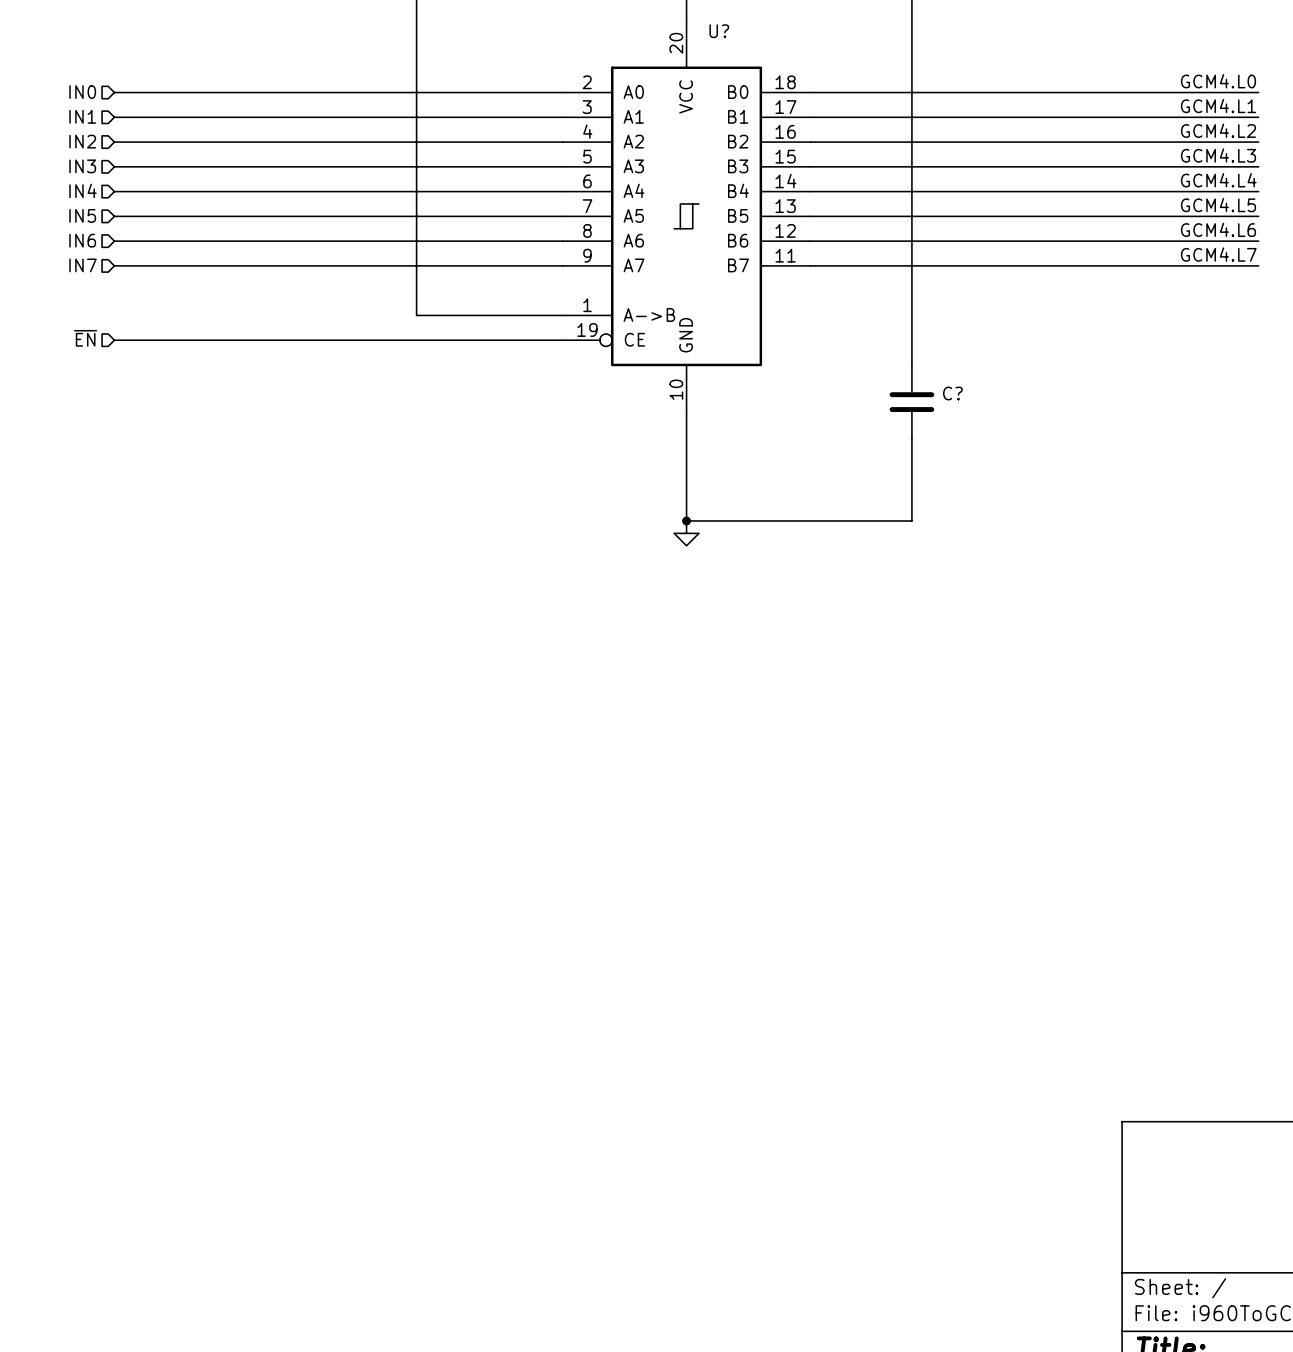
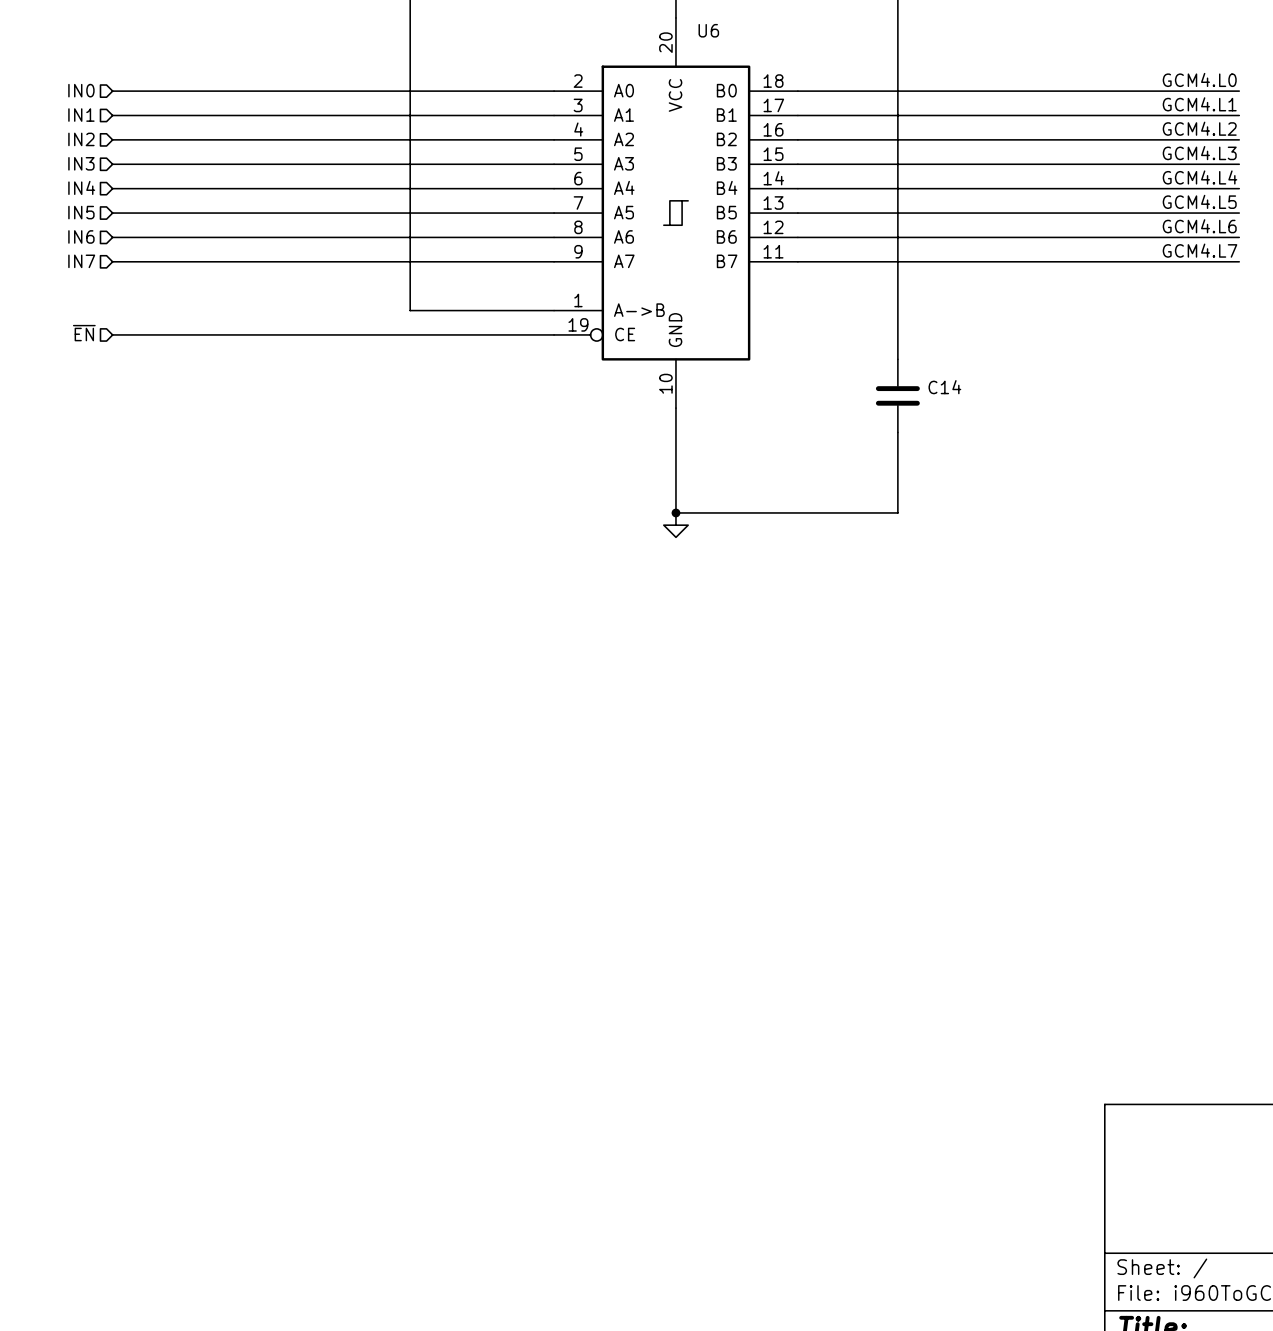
U? name: U? (719, 31) -> U6 (708, 30)
C? name: C? (952, 393) -> C14 (944, 387)

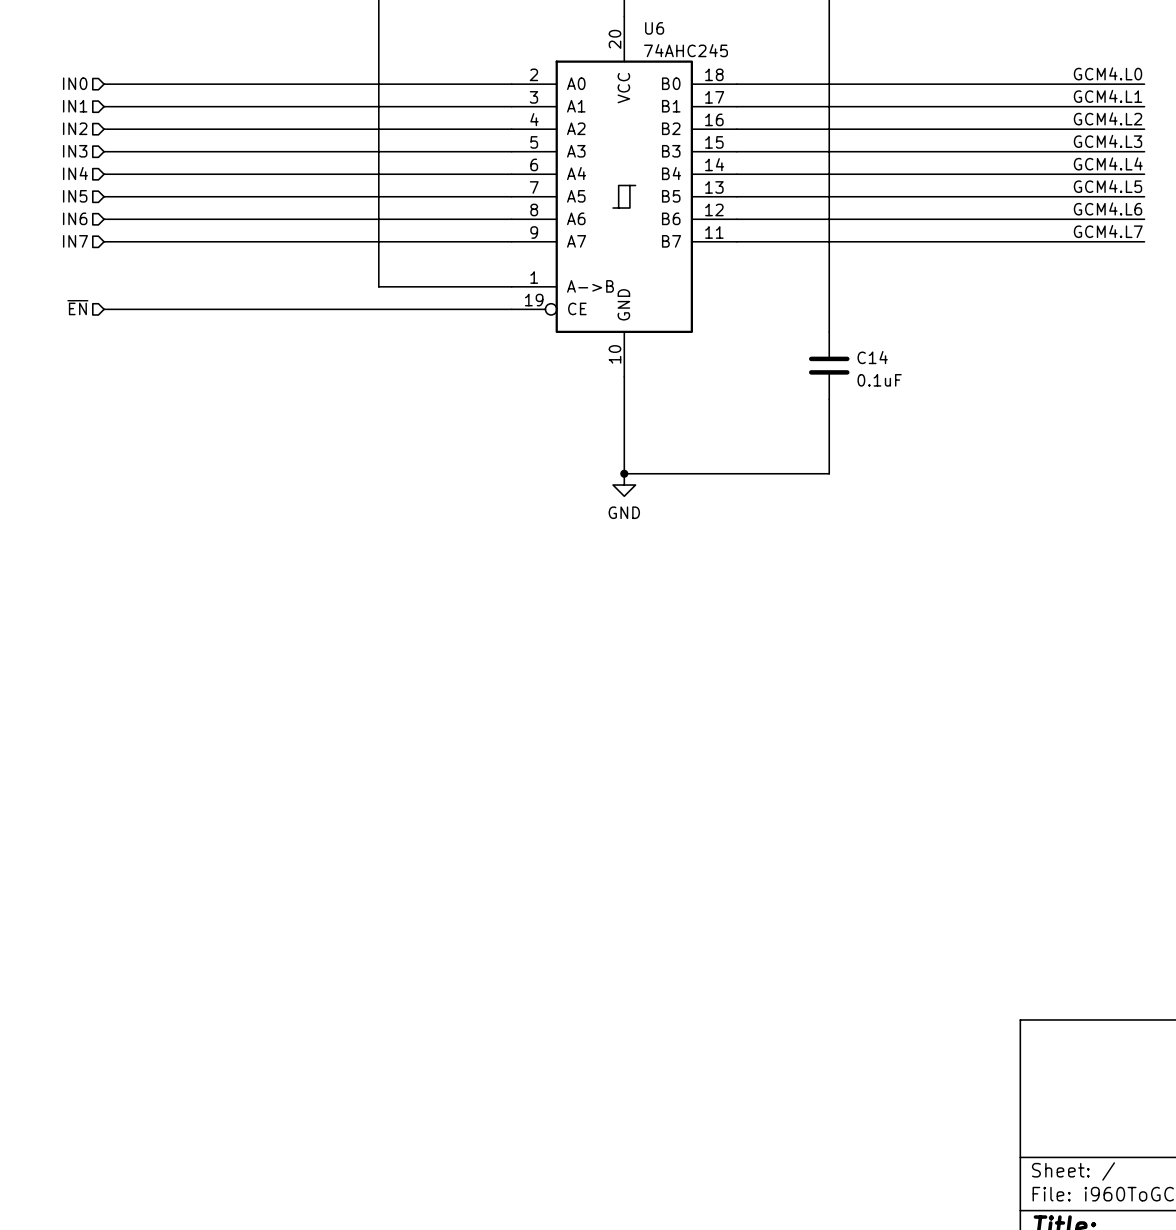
U6 value: none -> 74AHC245 (685, 50)
C14 value: none -> 0.1uF (879, 380)
power symbol text: none -> GND (624, 512)

